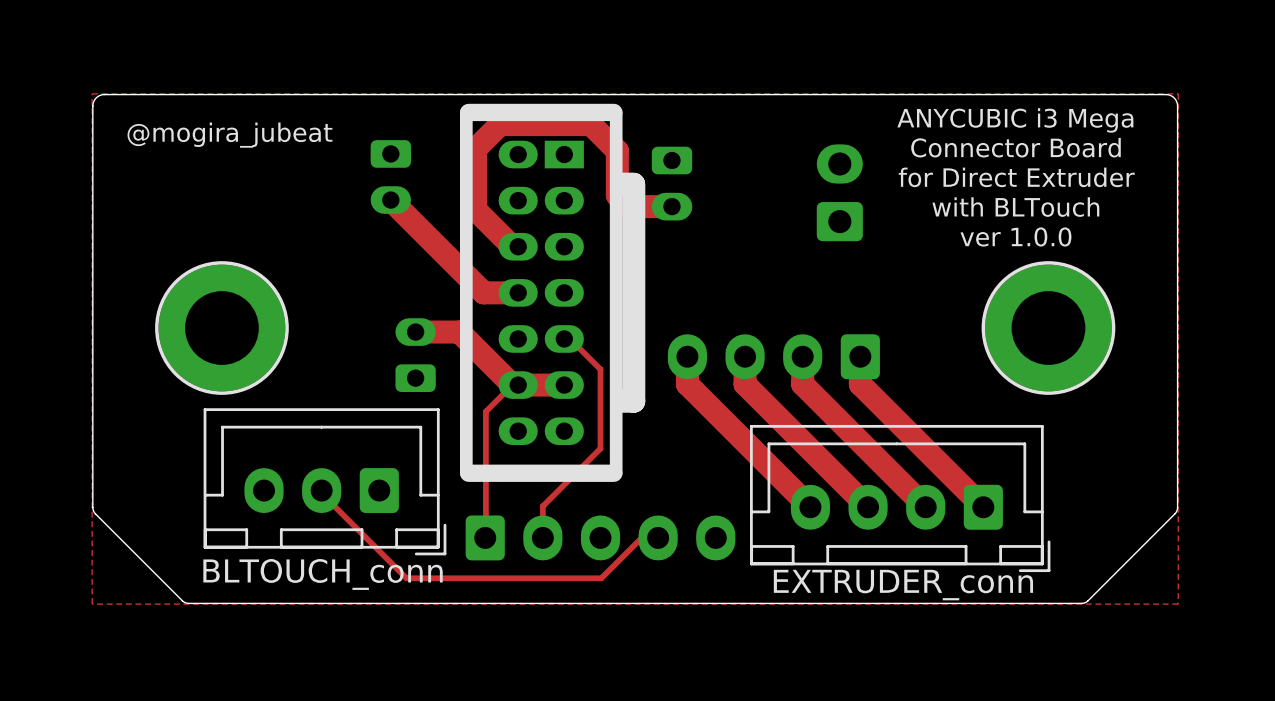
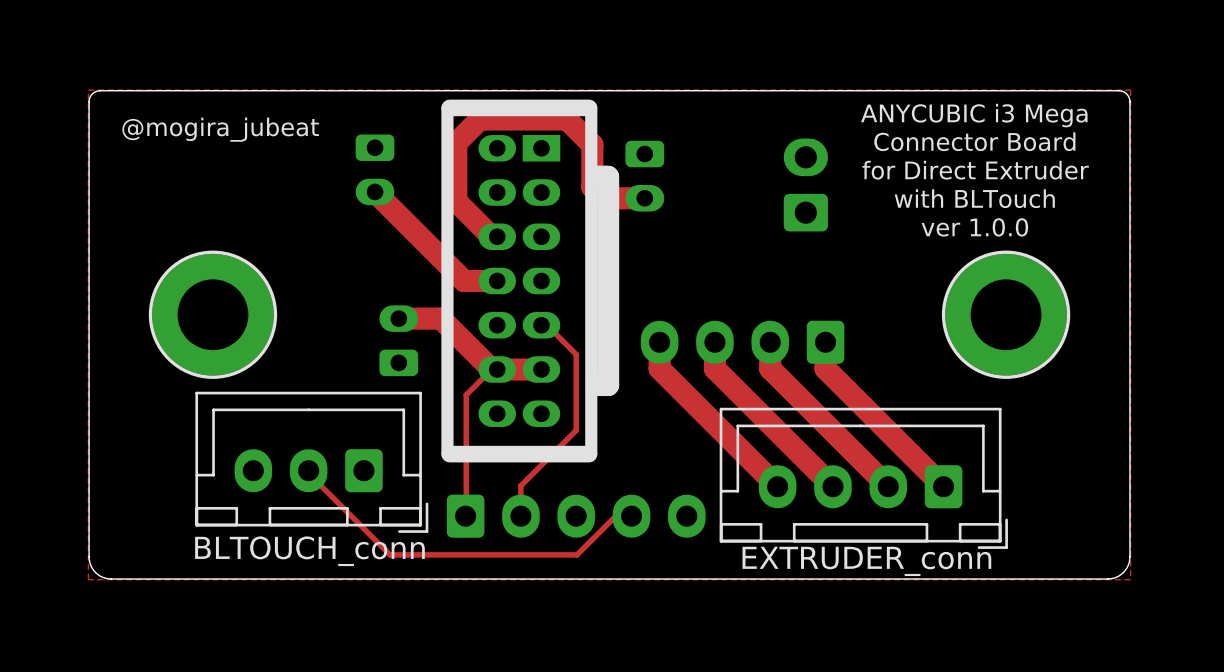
board edge: (92, 507) (95, 513) (182, 600) (188, 603) -> (89, 556) (93, 570) (105, 578) (181, 579)
board edge: none -> (89, 486) (89, 556)
board edge: (1177, 507) (1174, 513) (1088, 600) (1081, 603) -> (1129, 556) (1125, 570) (1113, 578) (1037, 579)
board edge: none -> (1129, 486) (1129, 556)

